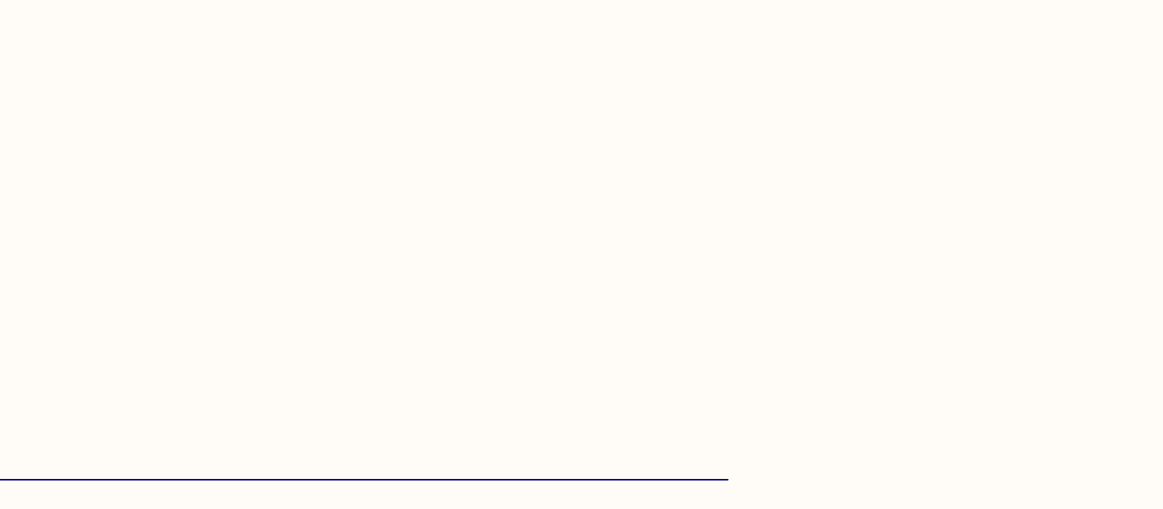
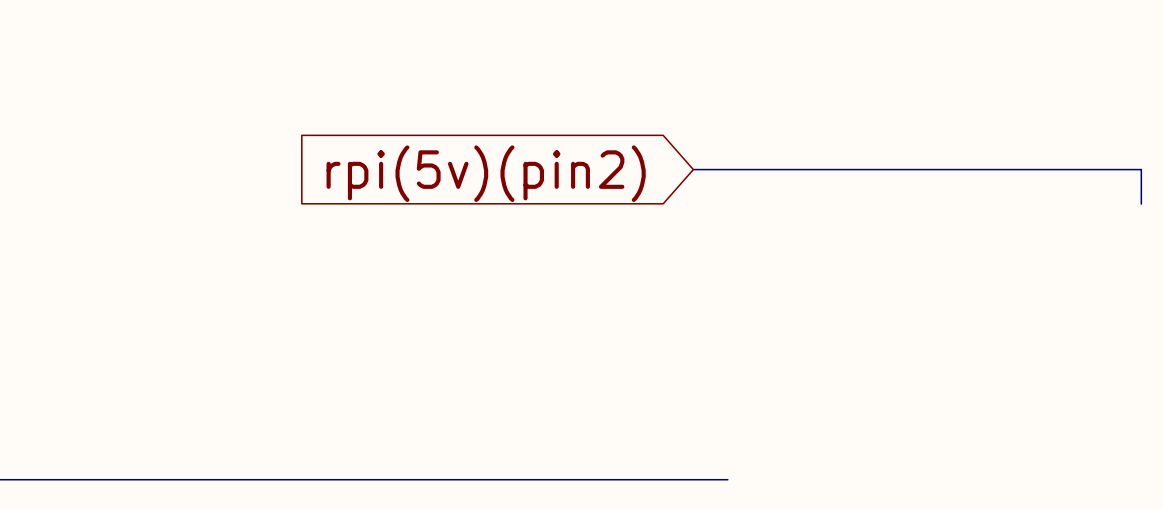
wire: none -> (693, 169) (1141, 169) (1141, 204)
global label: none -> rpi(5v)(pin2) (486, 173)

